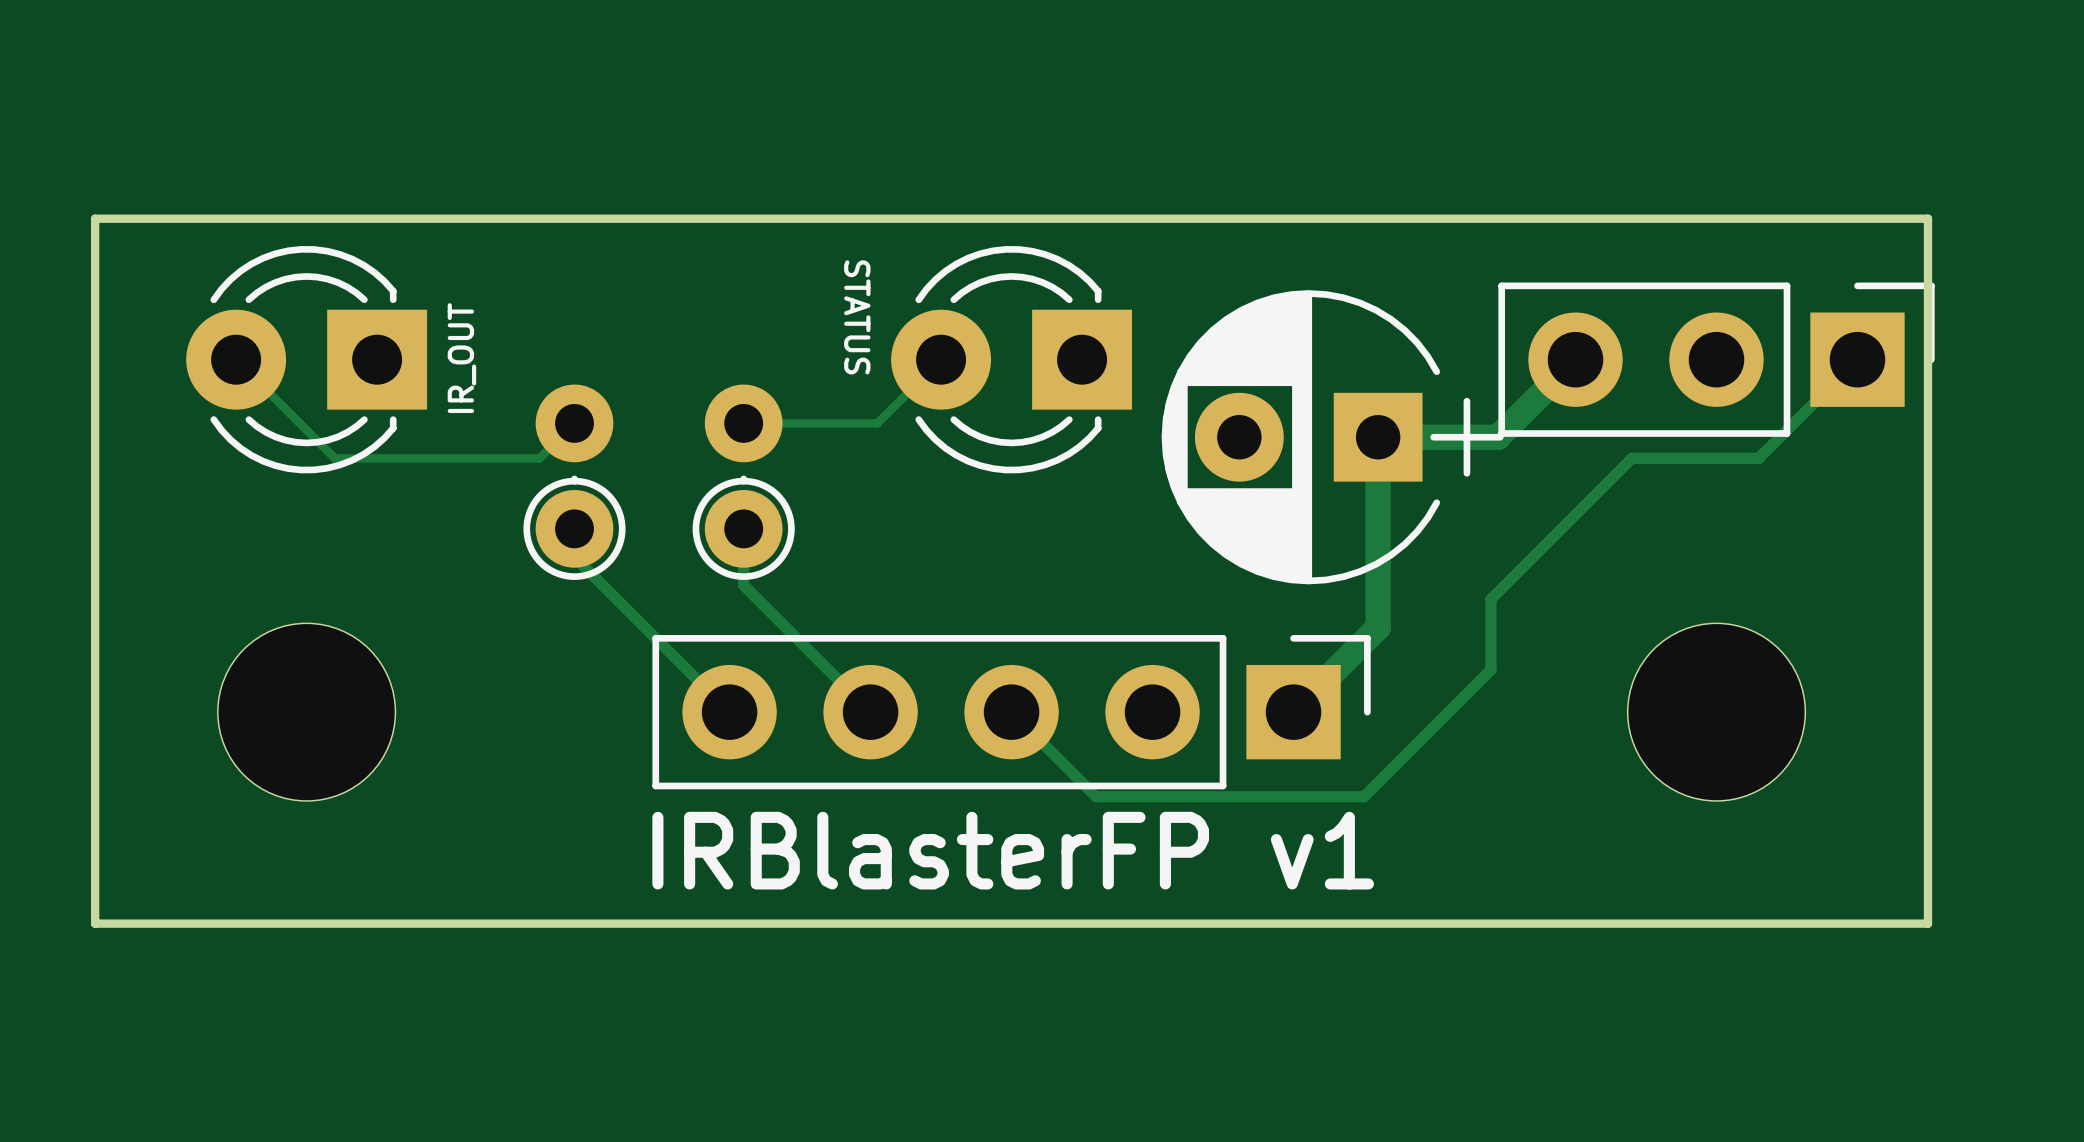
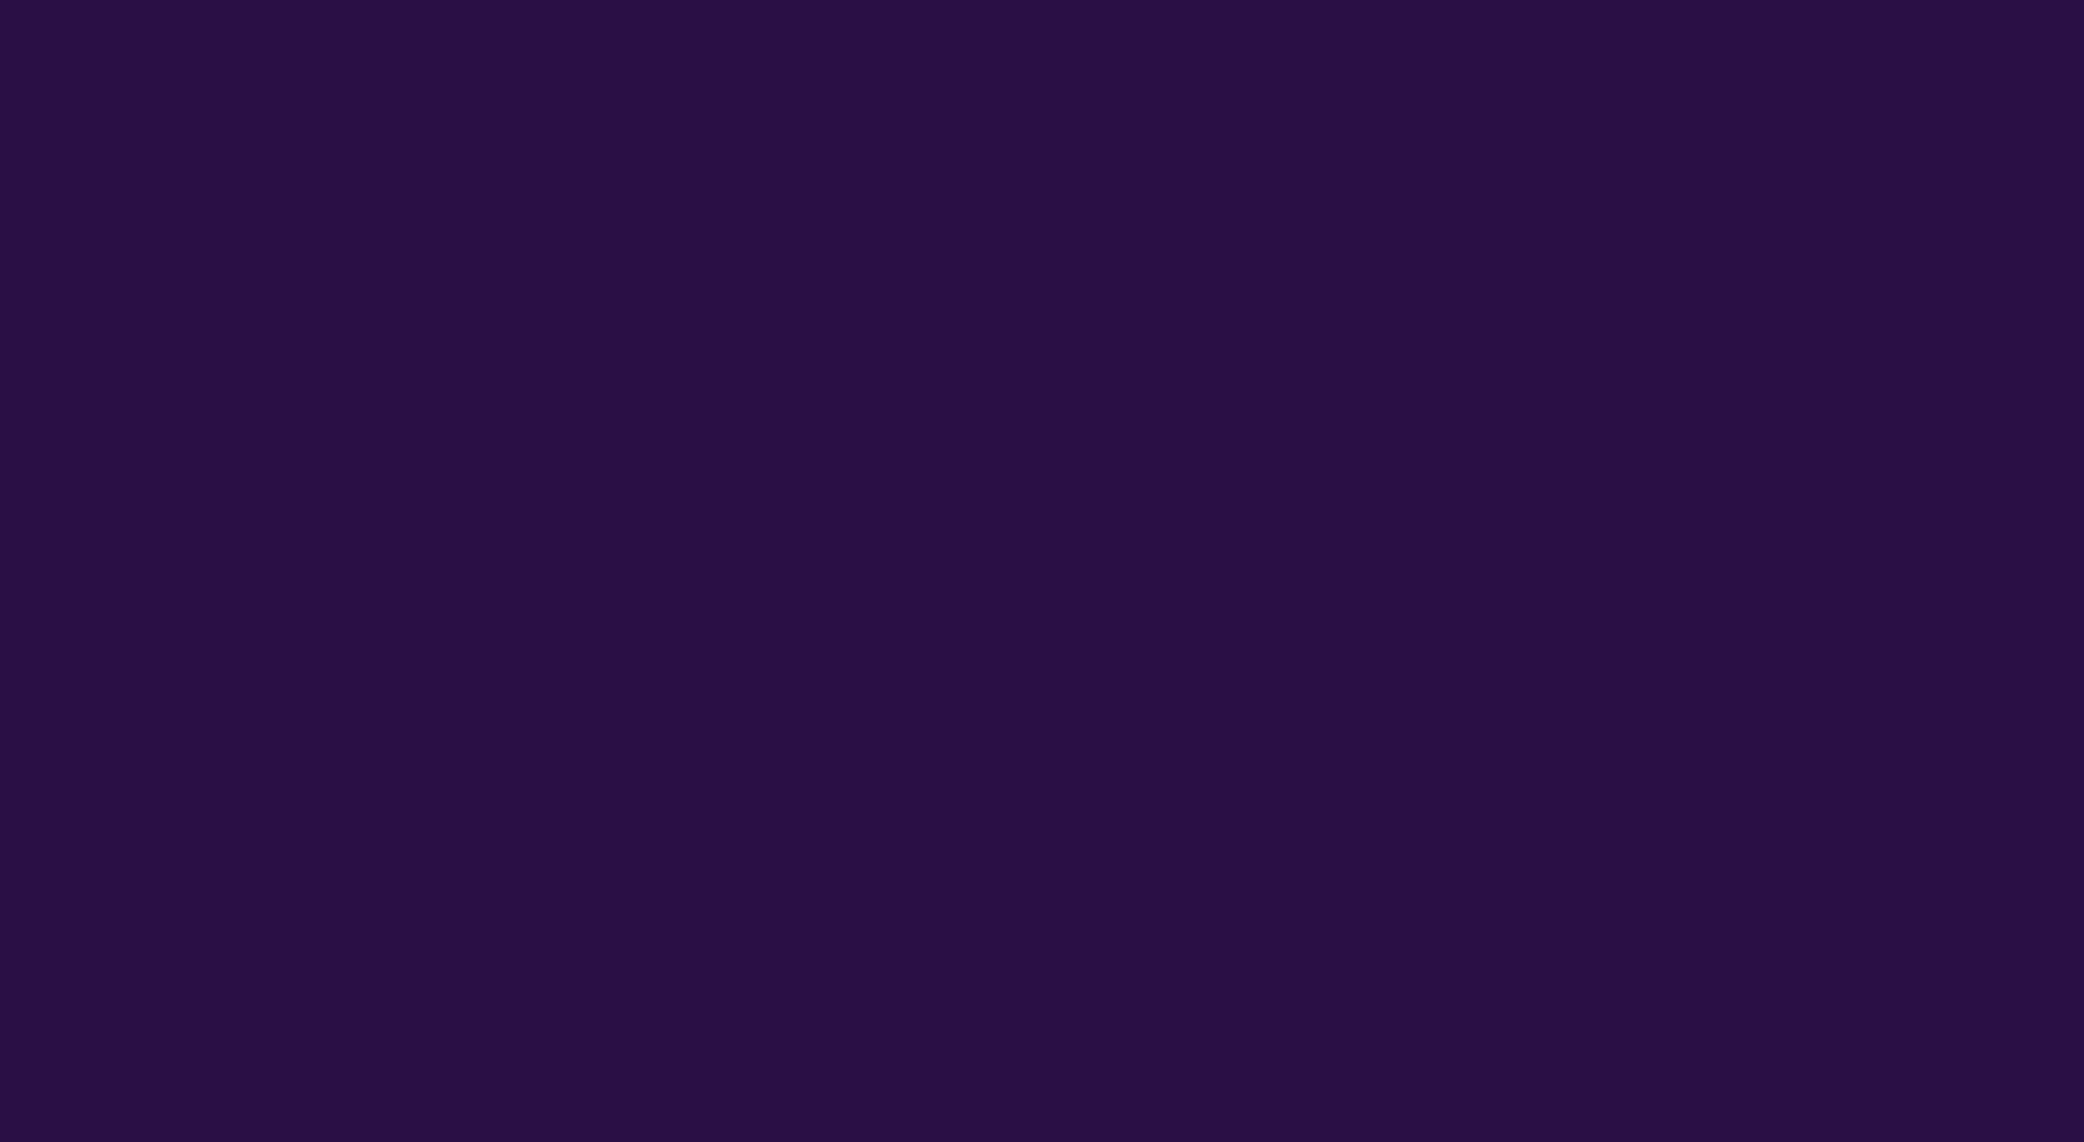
board edge: (95, 218) (1927, 218) (1927, 923) (95, 923) (95, 218) -> none
track: (236, 359) (334, 458) (539, 458) (574, 423) -> none
part: IR_OUT (306, 359) -> none
track: (941, 359) (877, 423) (743, 423) -> none
part: STATUS (1011, 359) -> none
track: (1575, 359) (1497, 437) (1378, 437) (1378, 627) (1293, 712) -> none
part: (1716, 359) -> none
track: (1857, 359) (1758, 458) (1631, 458) (1490, 599) (1490, 669) (1364, 796) (1096, 796) (1011, 712) -> none
part: (1332, 437) -> none
part: (574, 482) -> none
part: (743, 482) -> none
track: (574, 528) (574, 557) (729, 712) -> none
track: (743, 528) (743, 585) (870, 712) -> none
part: (306, 712) -> none
part: (1011, 712) -> none
part: (1716, 712) -> none
text: IRBlasterFP v1 (1013, 850) -> none

